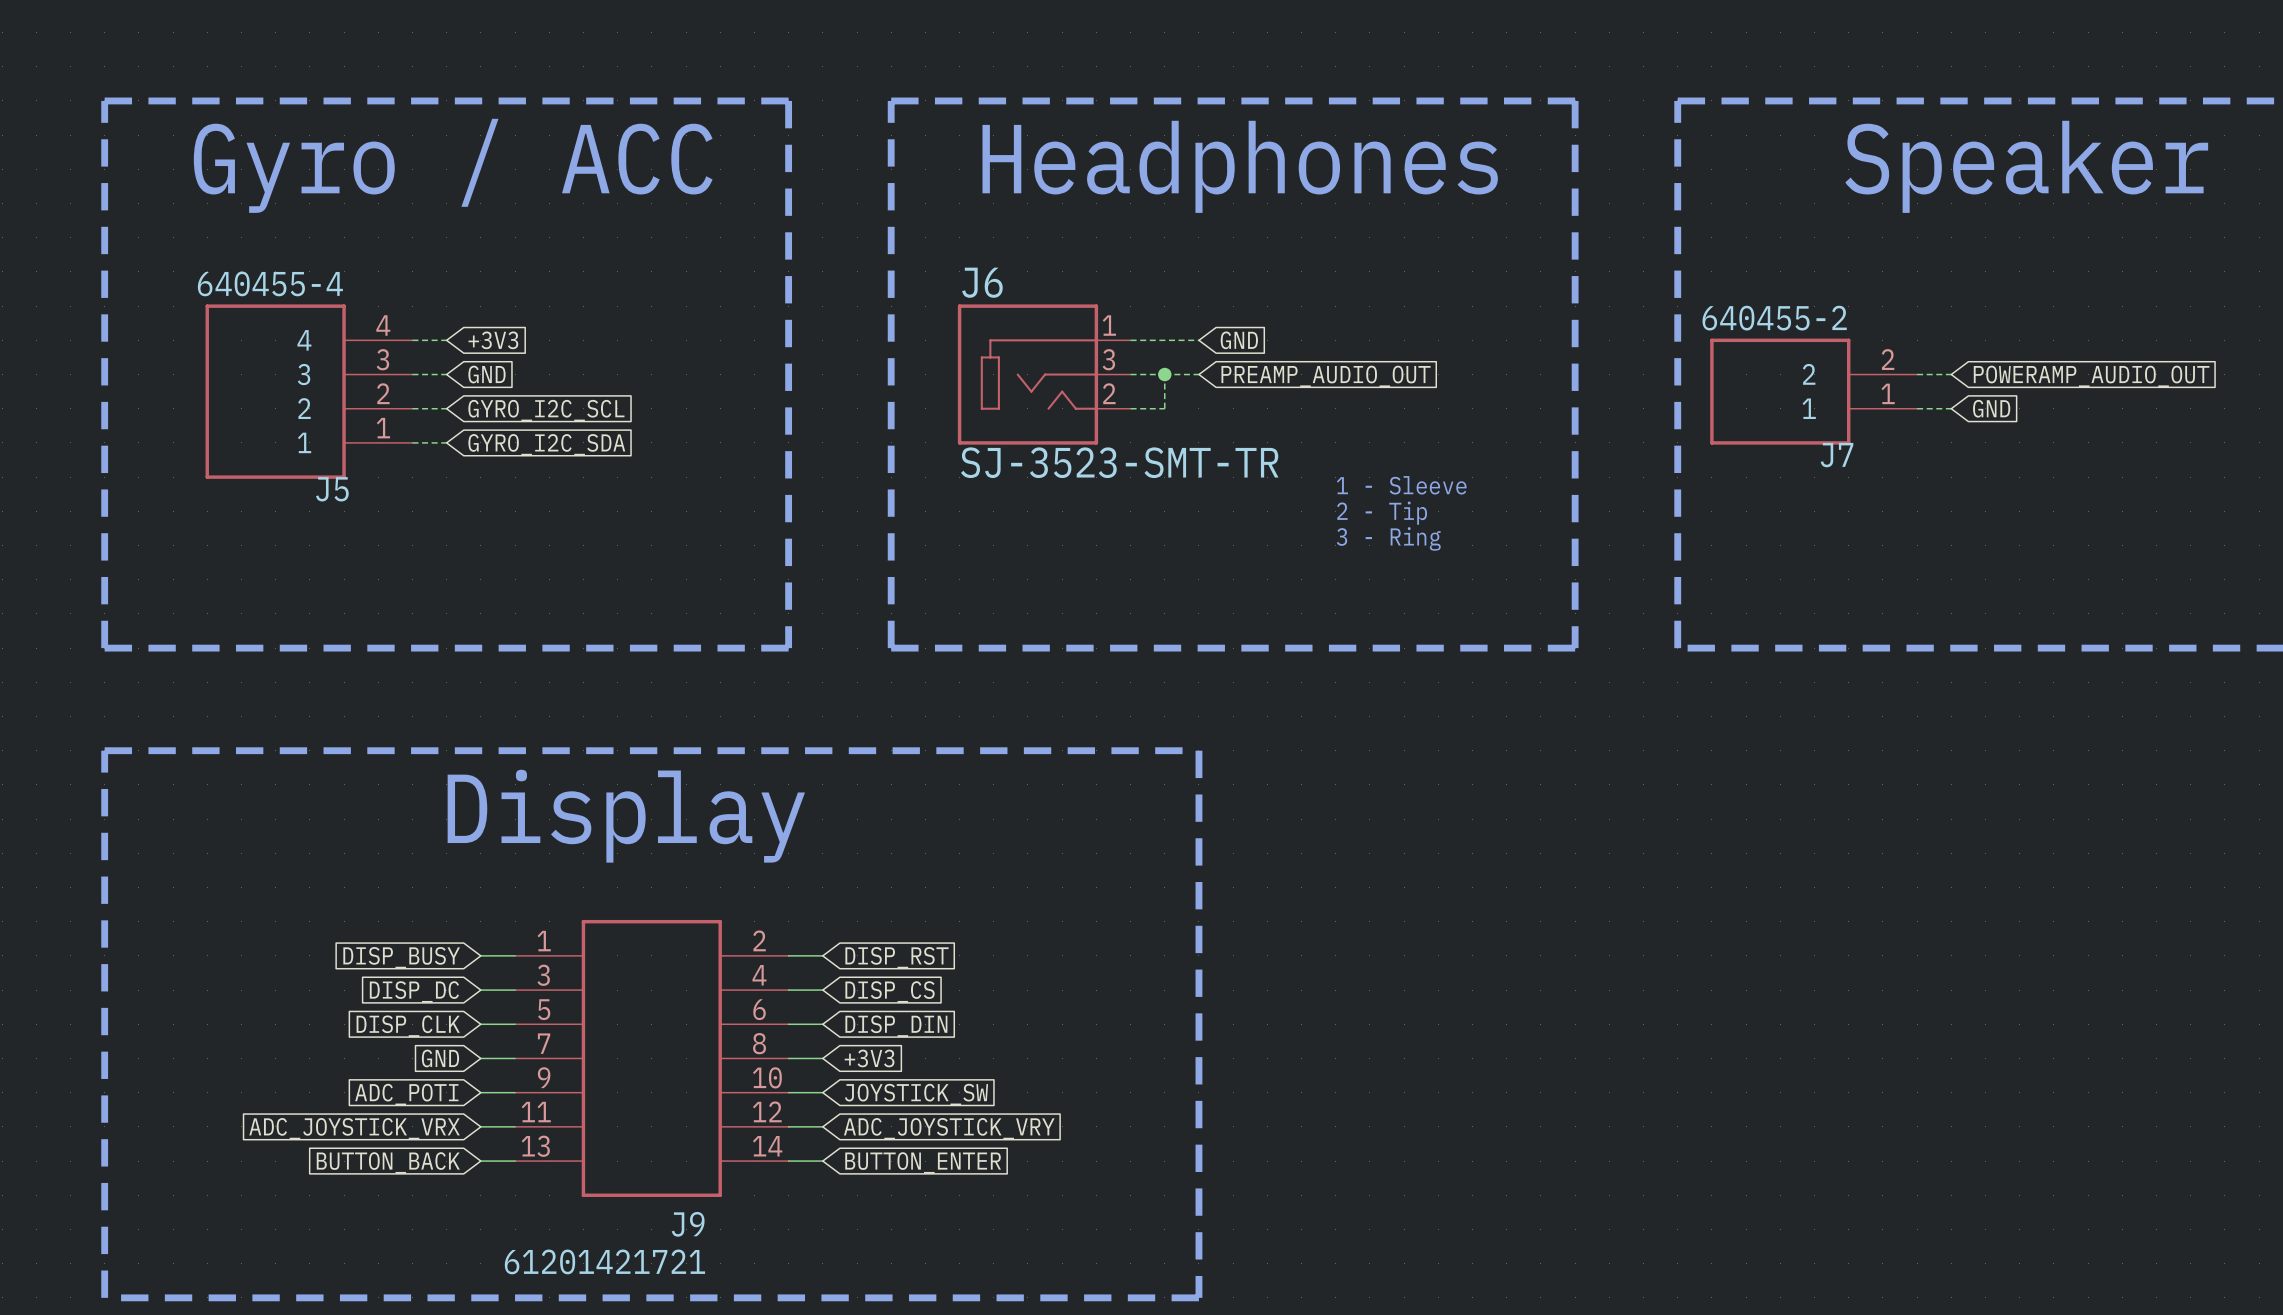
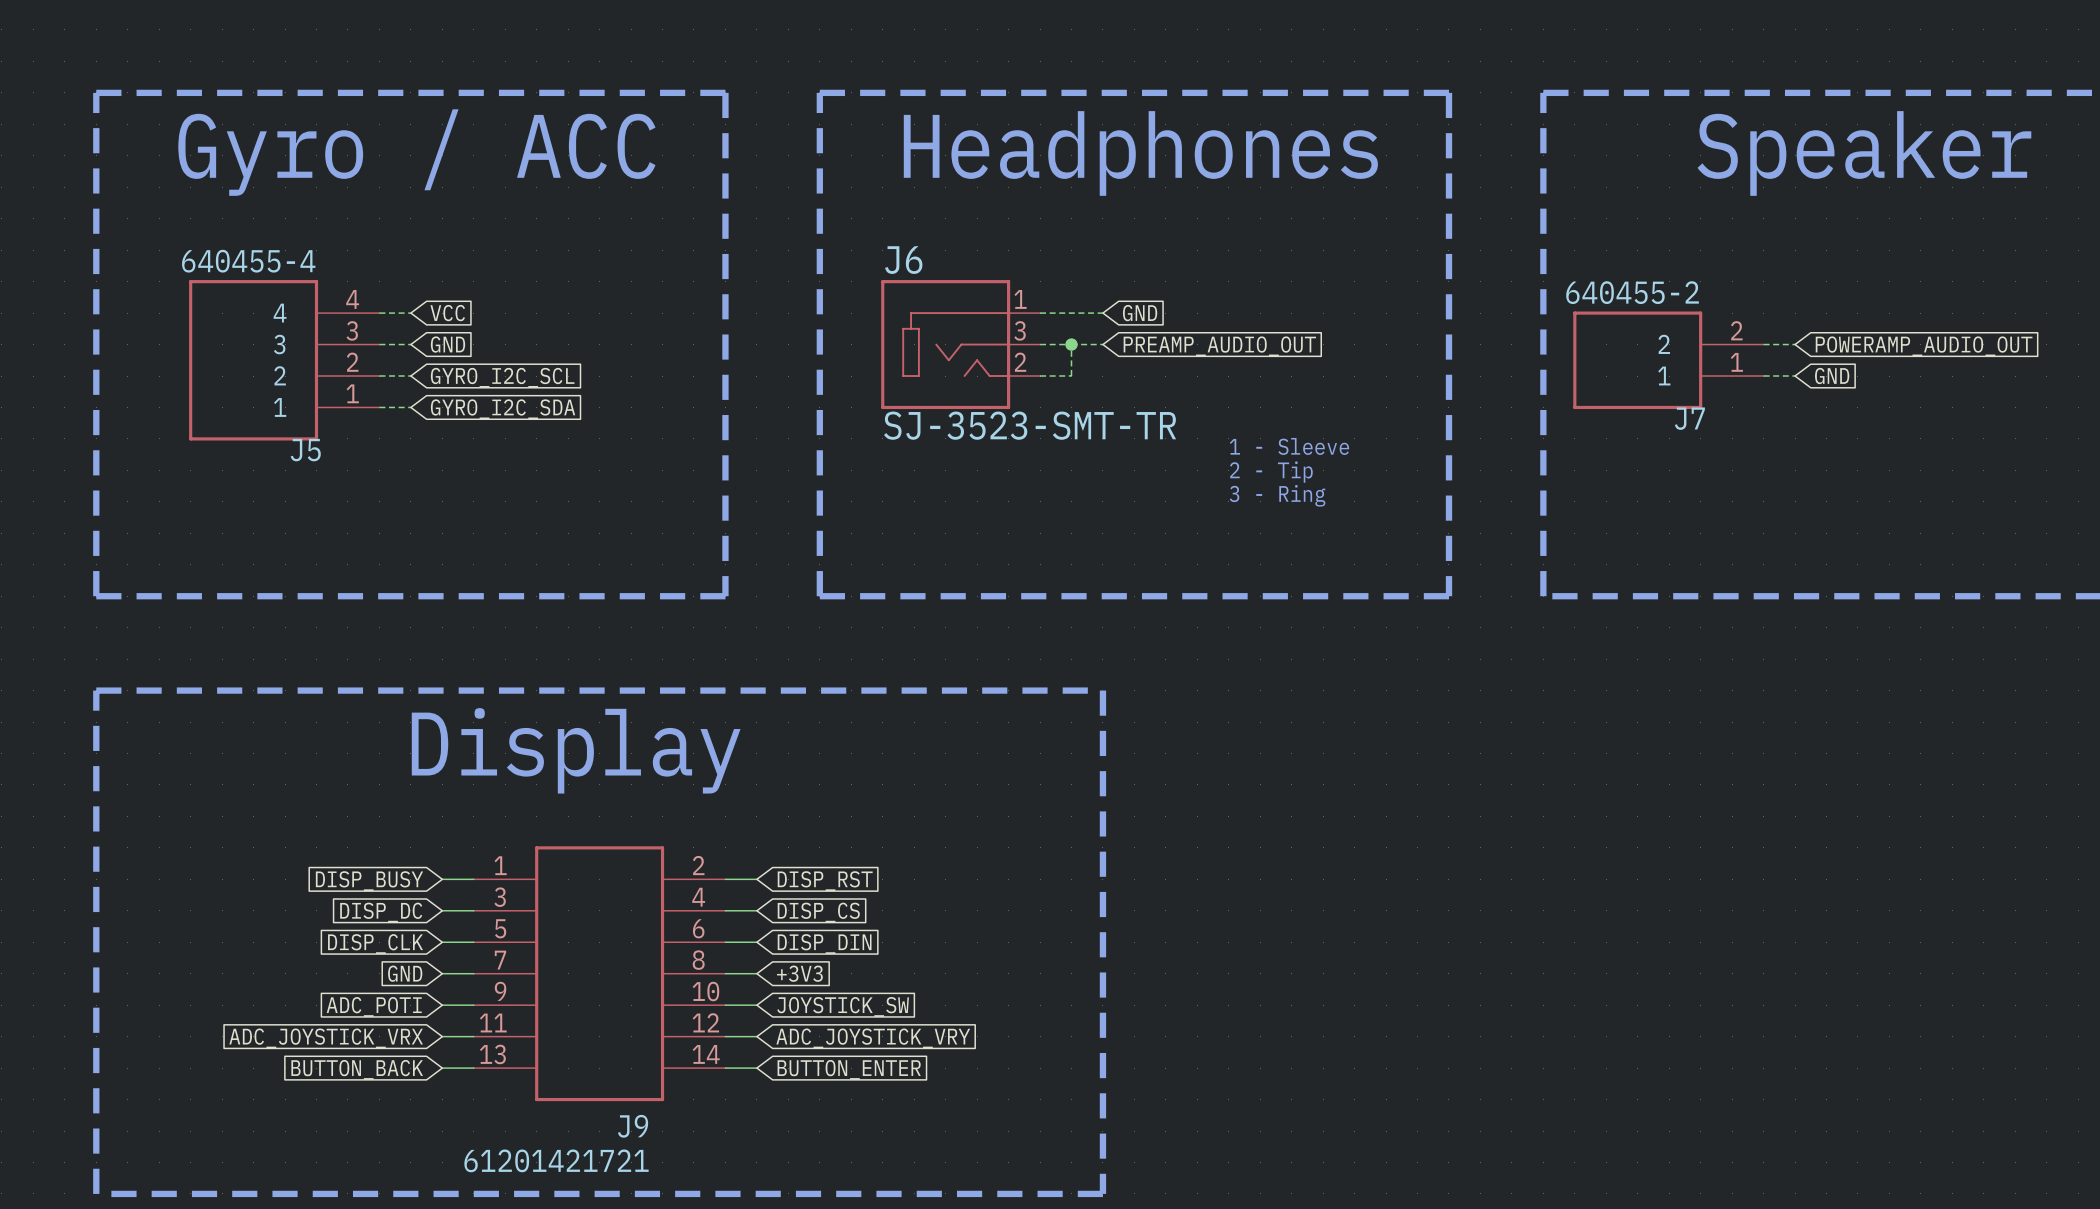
global label: +3V3 (493, 340) -> VCC (447, 313)

